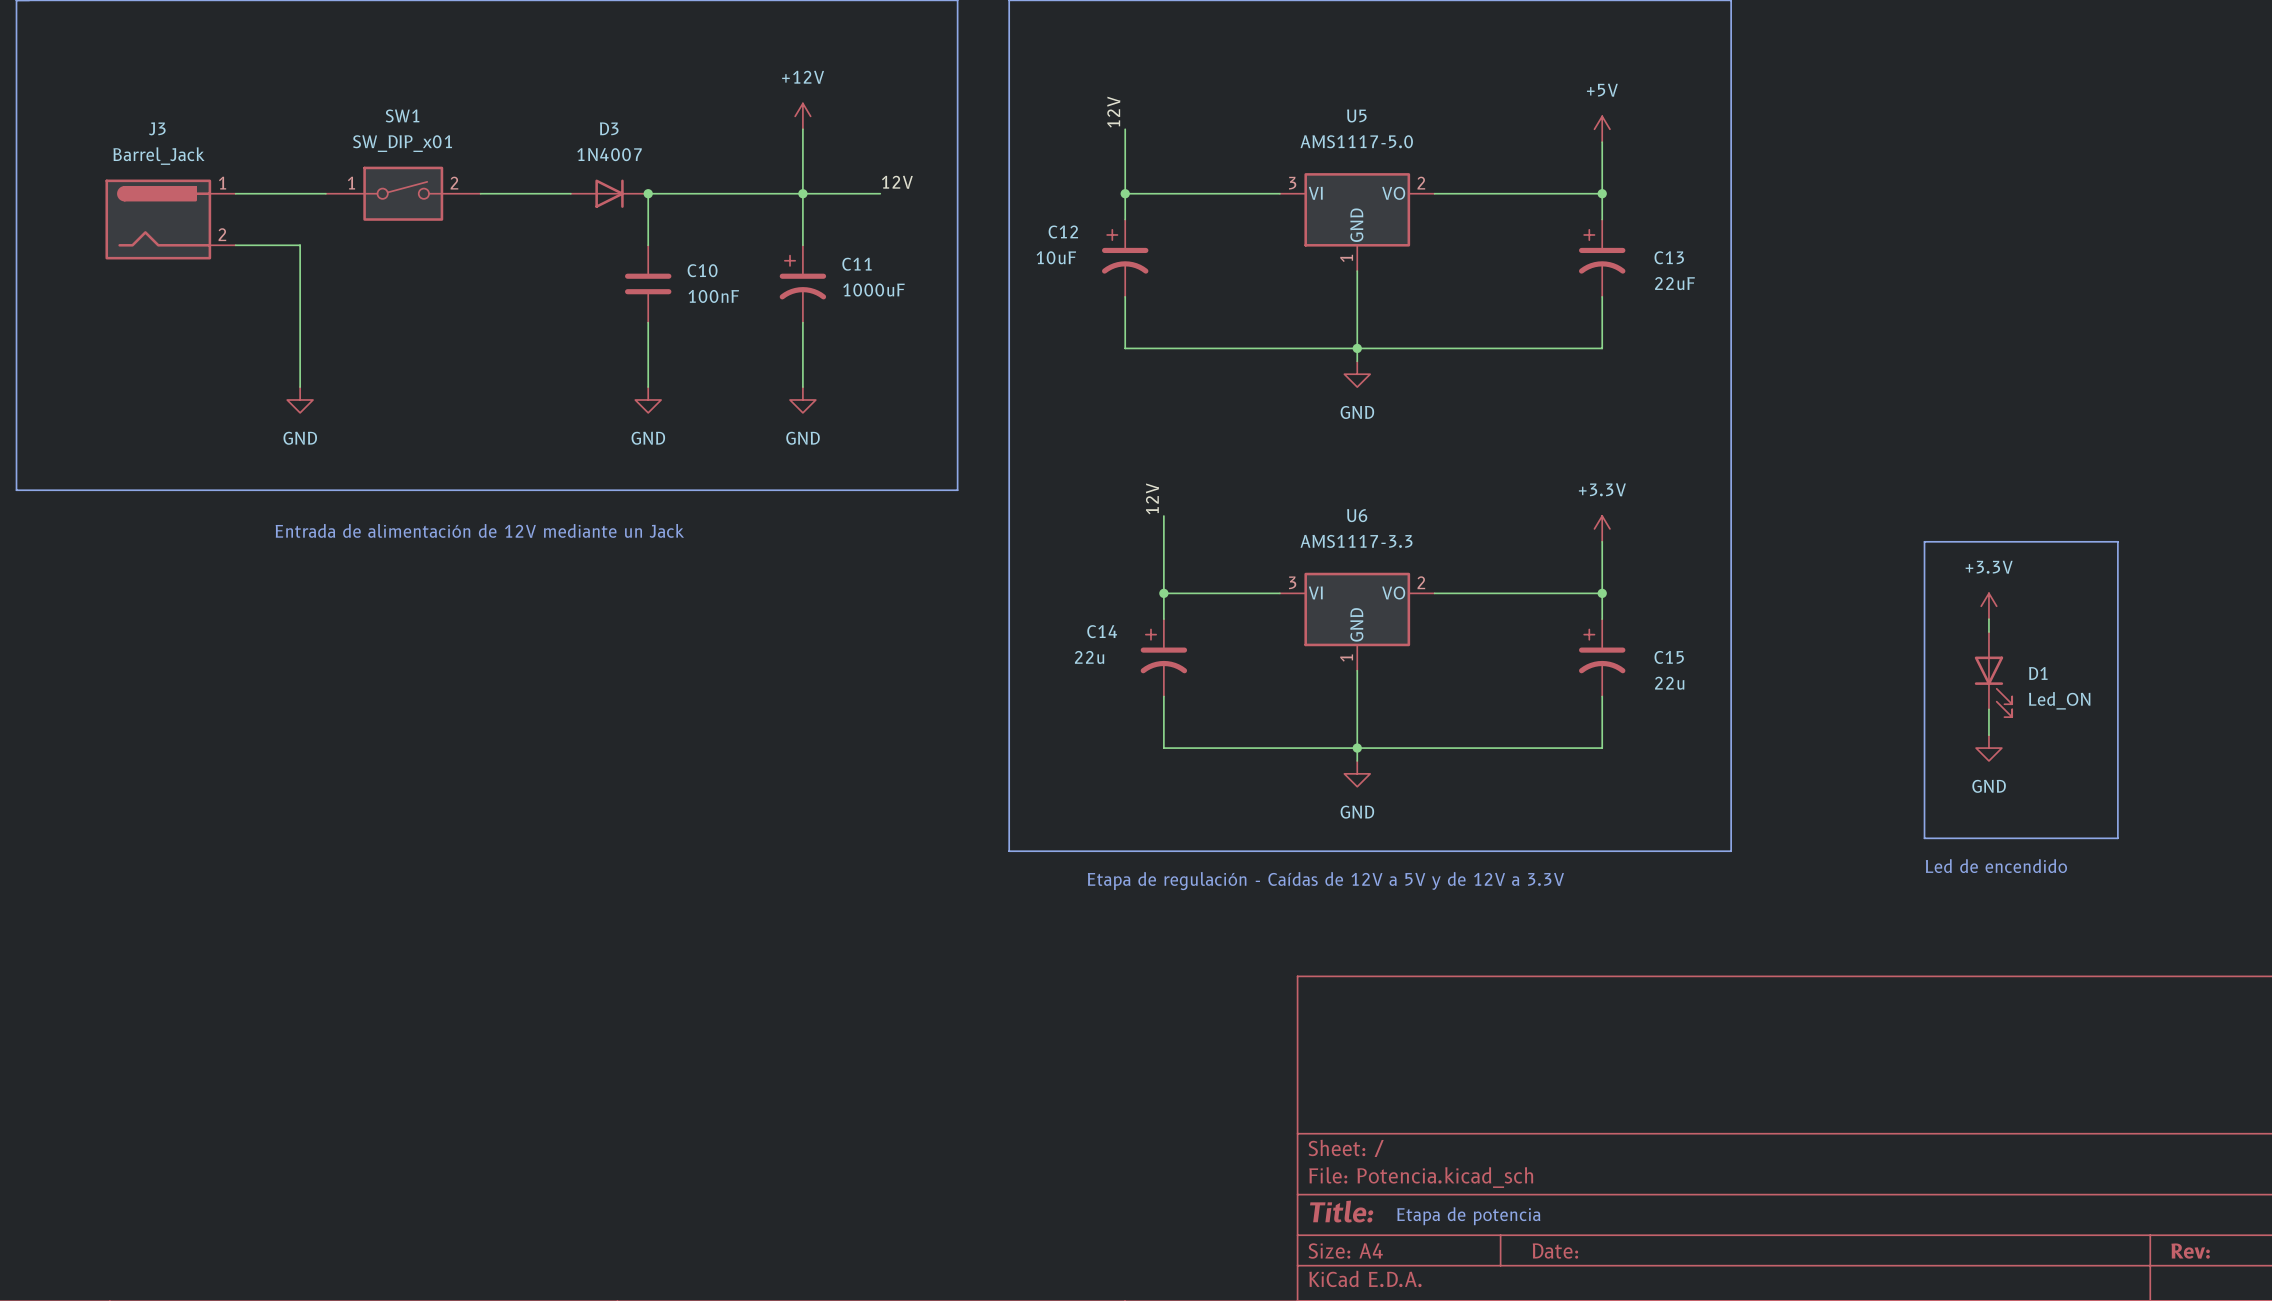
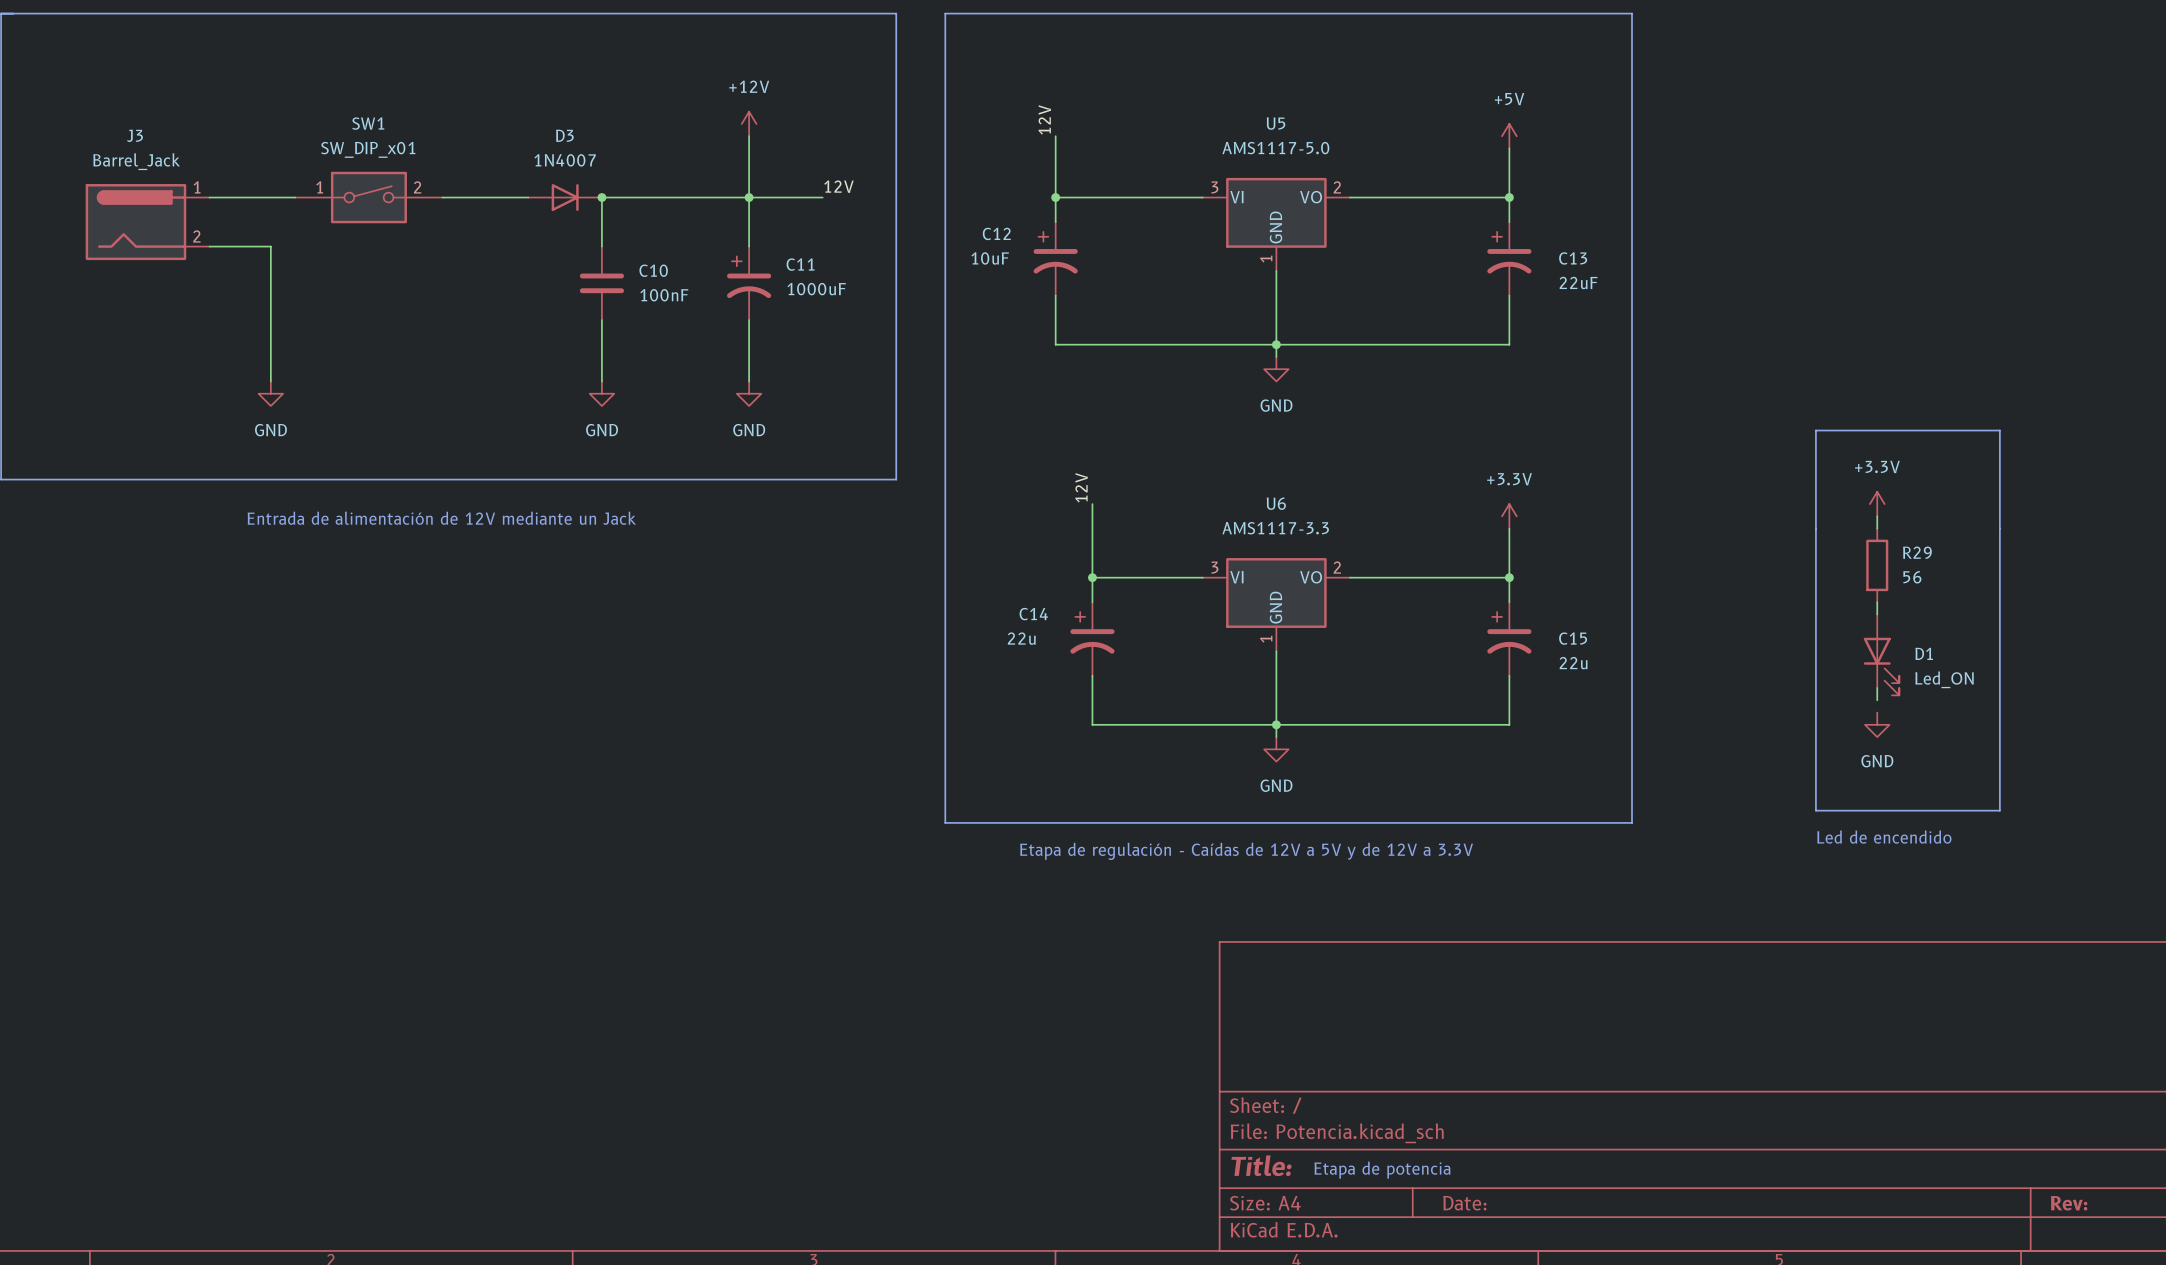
line: (1924, 541) (2117, 541) -> (1815, 528) (1815, 430) (1999, 430) (1999, 528)
R29: none -> 56 (1877, 565)
power symbol position: +3.3V (1988, 606) -> +3.3V (1877, 504)
wire: (1988, 722) (1988, 735) -> (1877, 516) (1877, 528)

